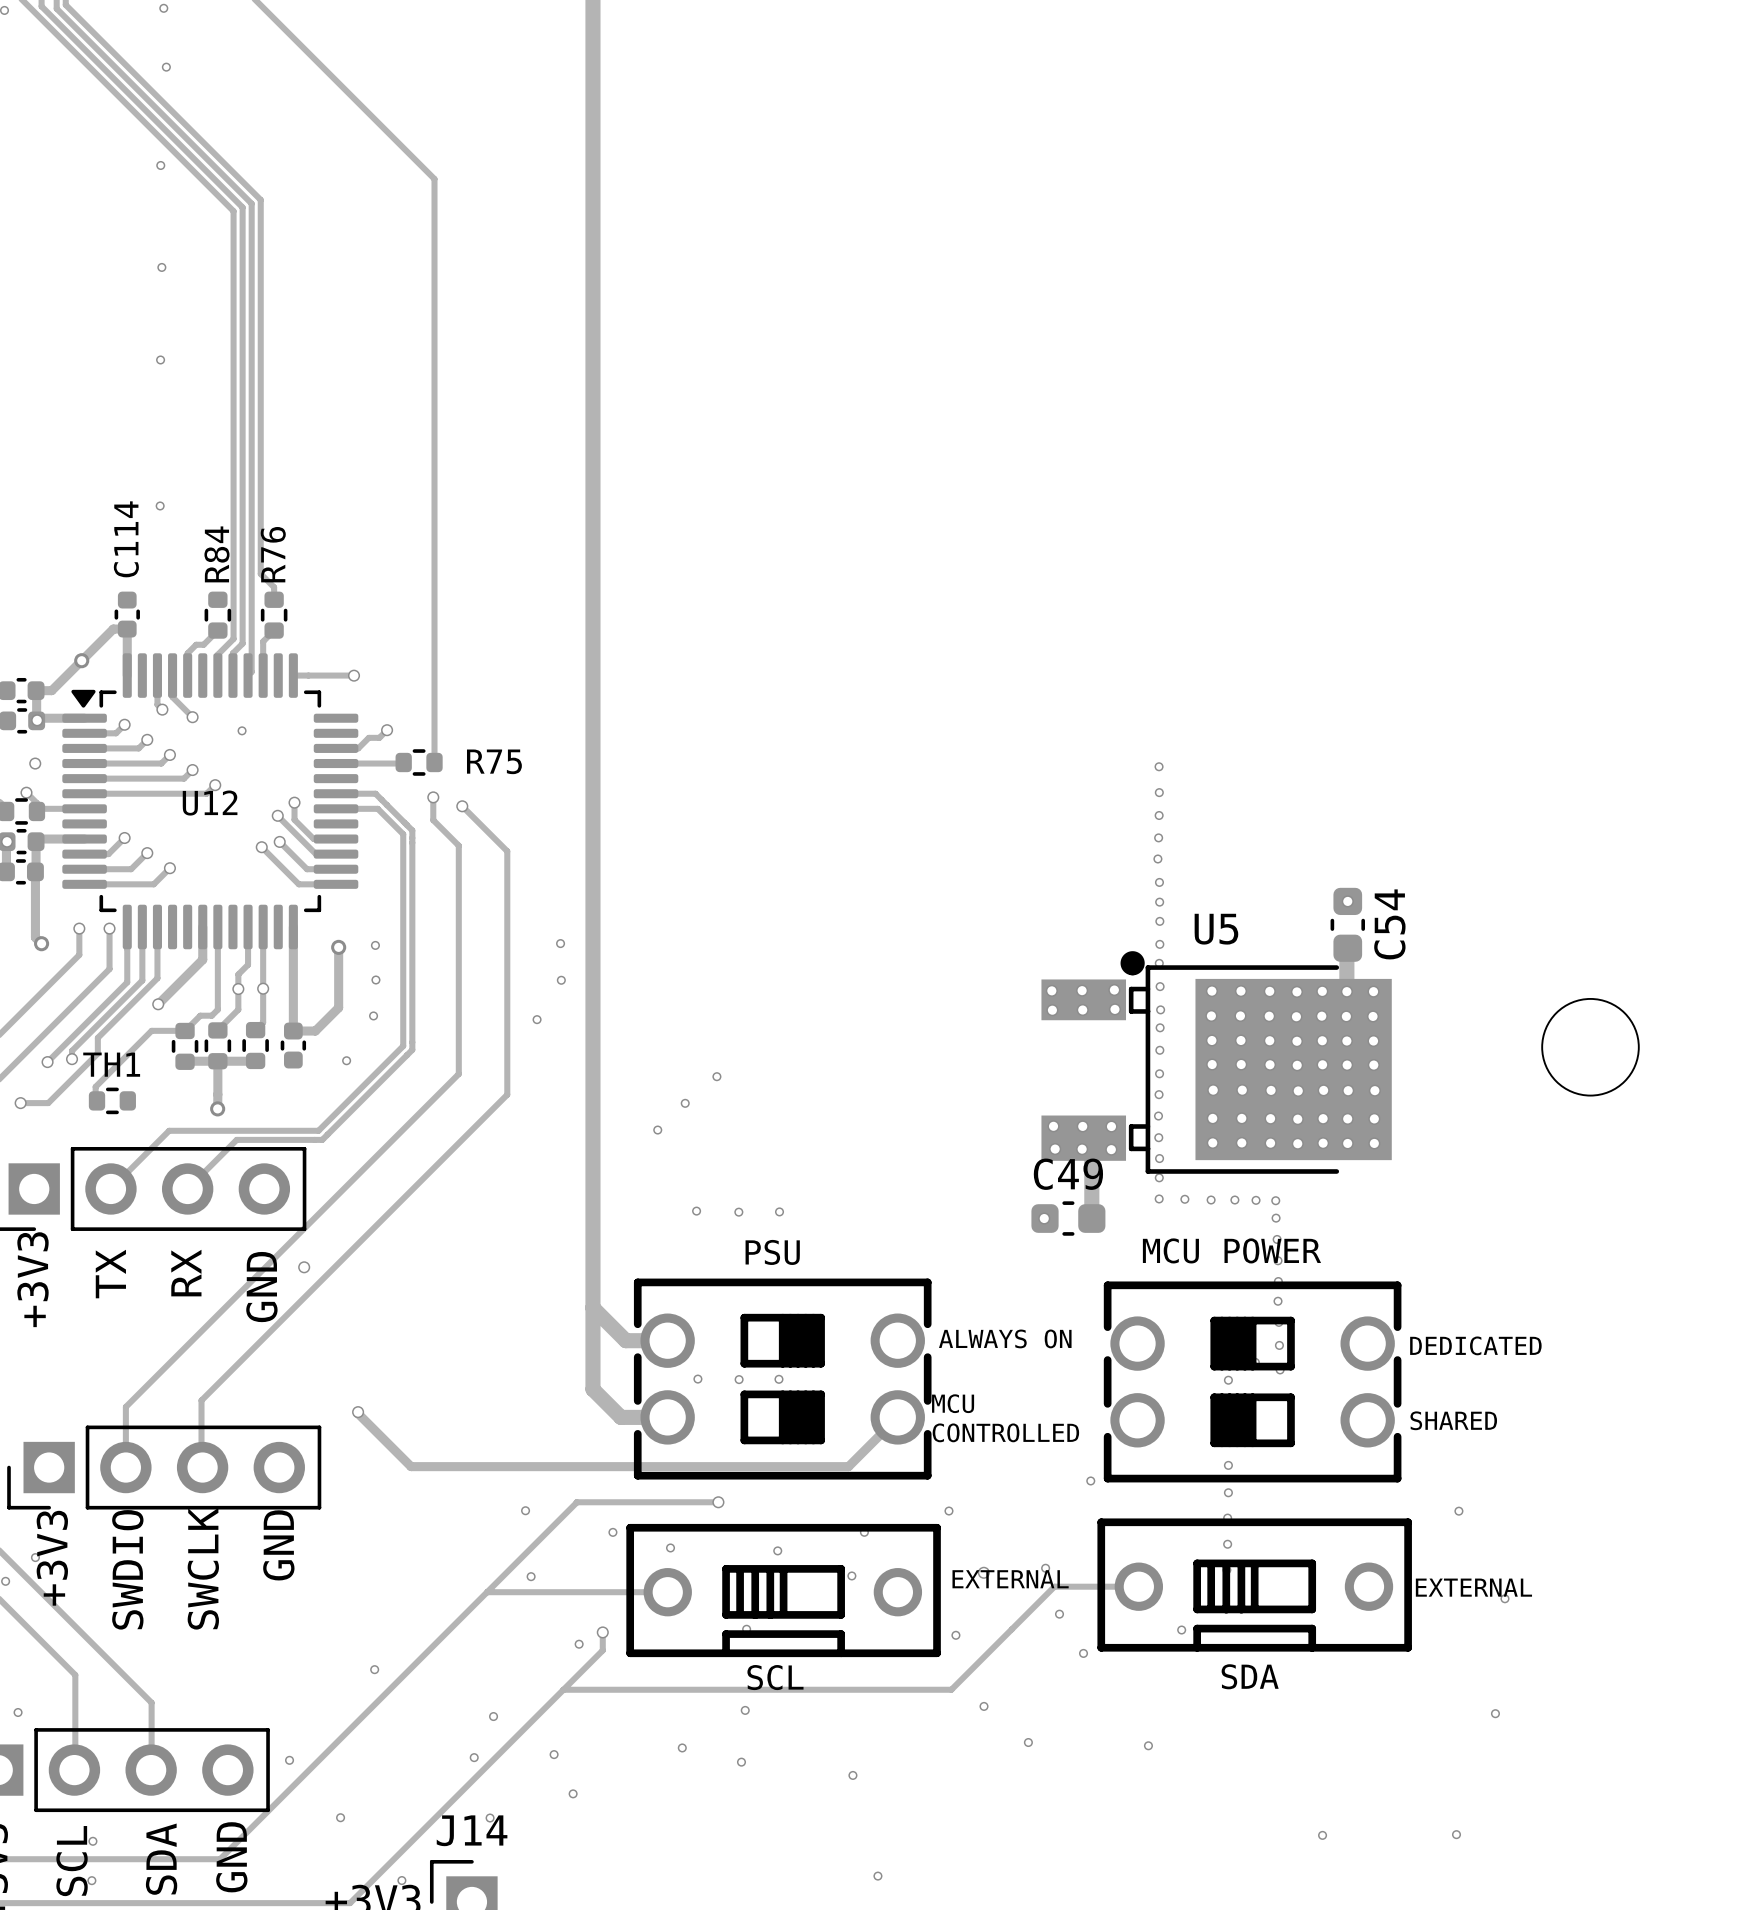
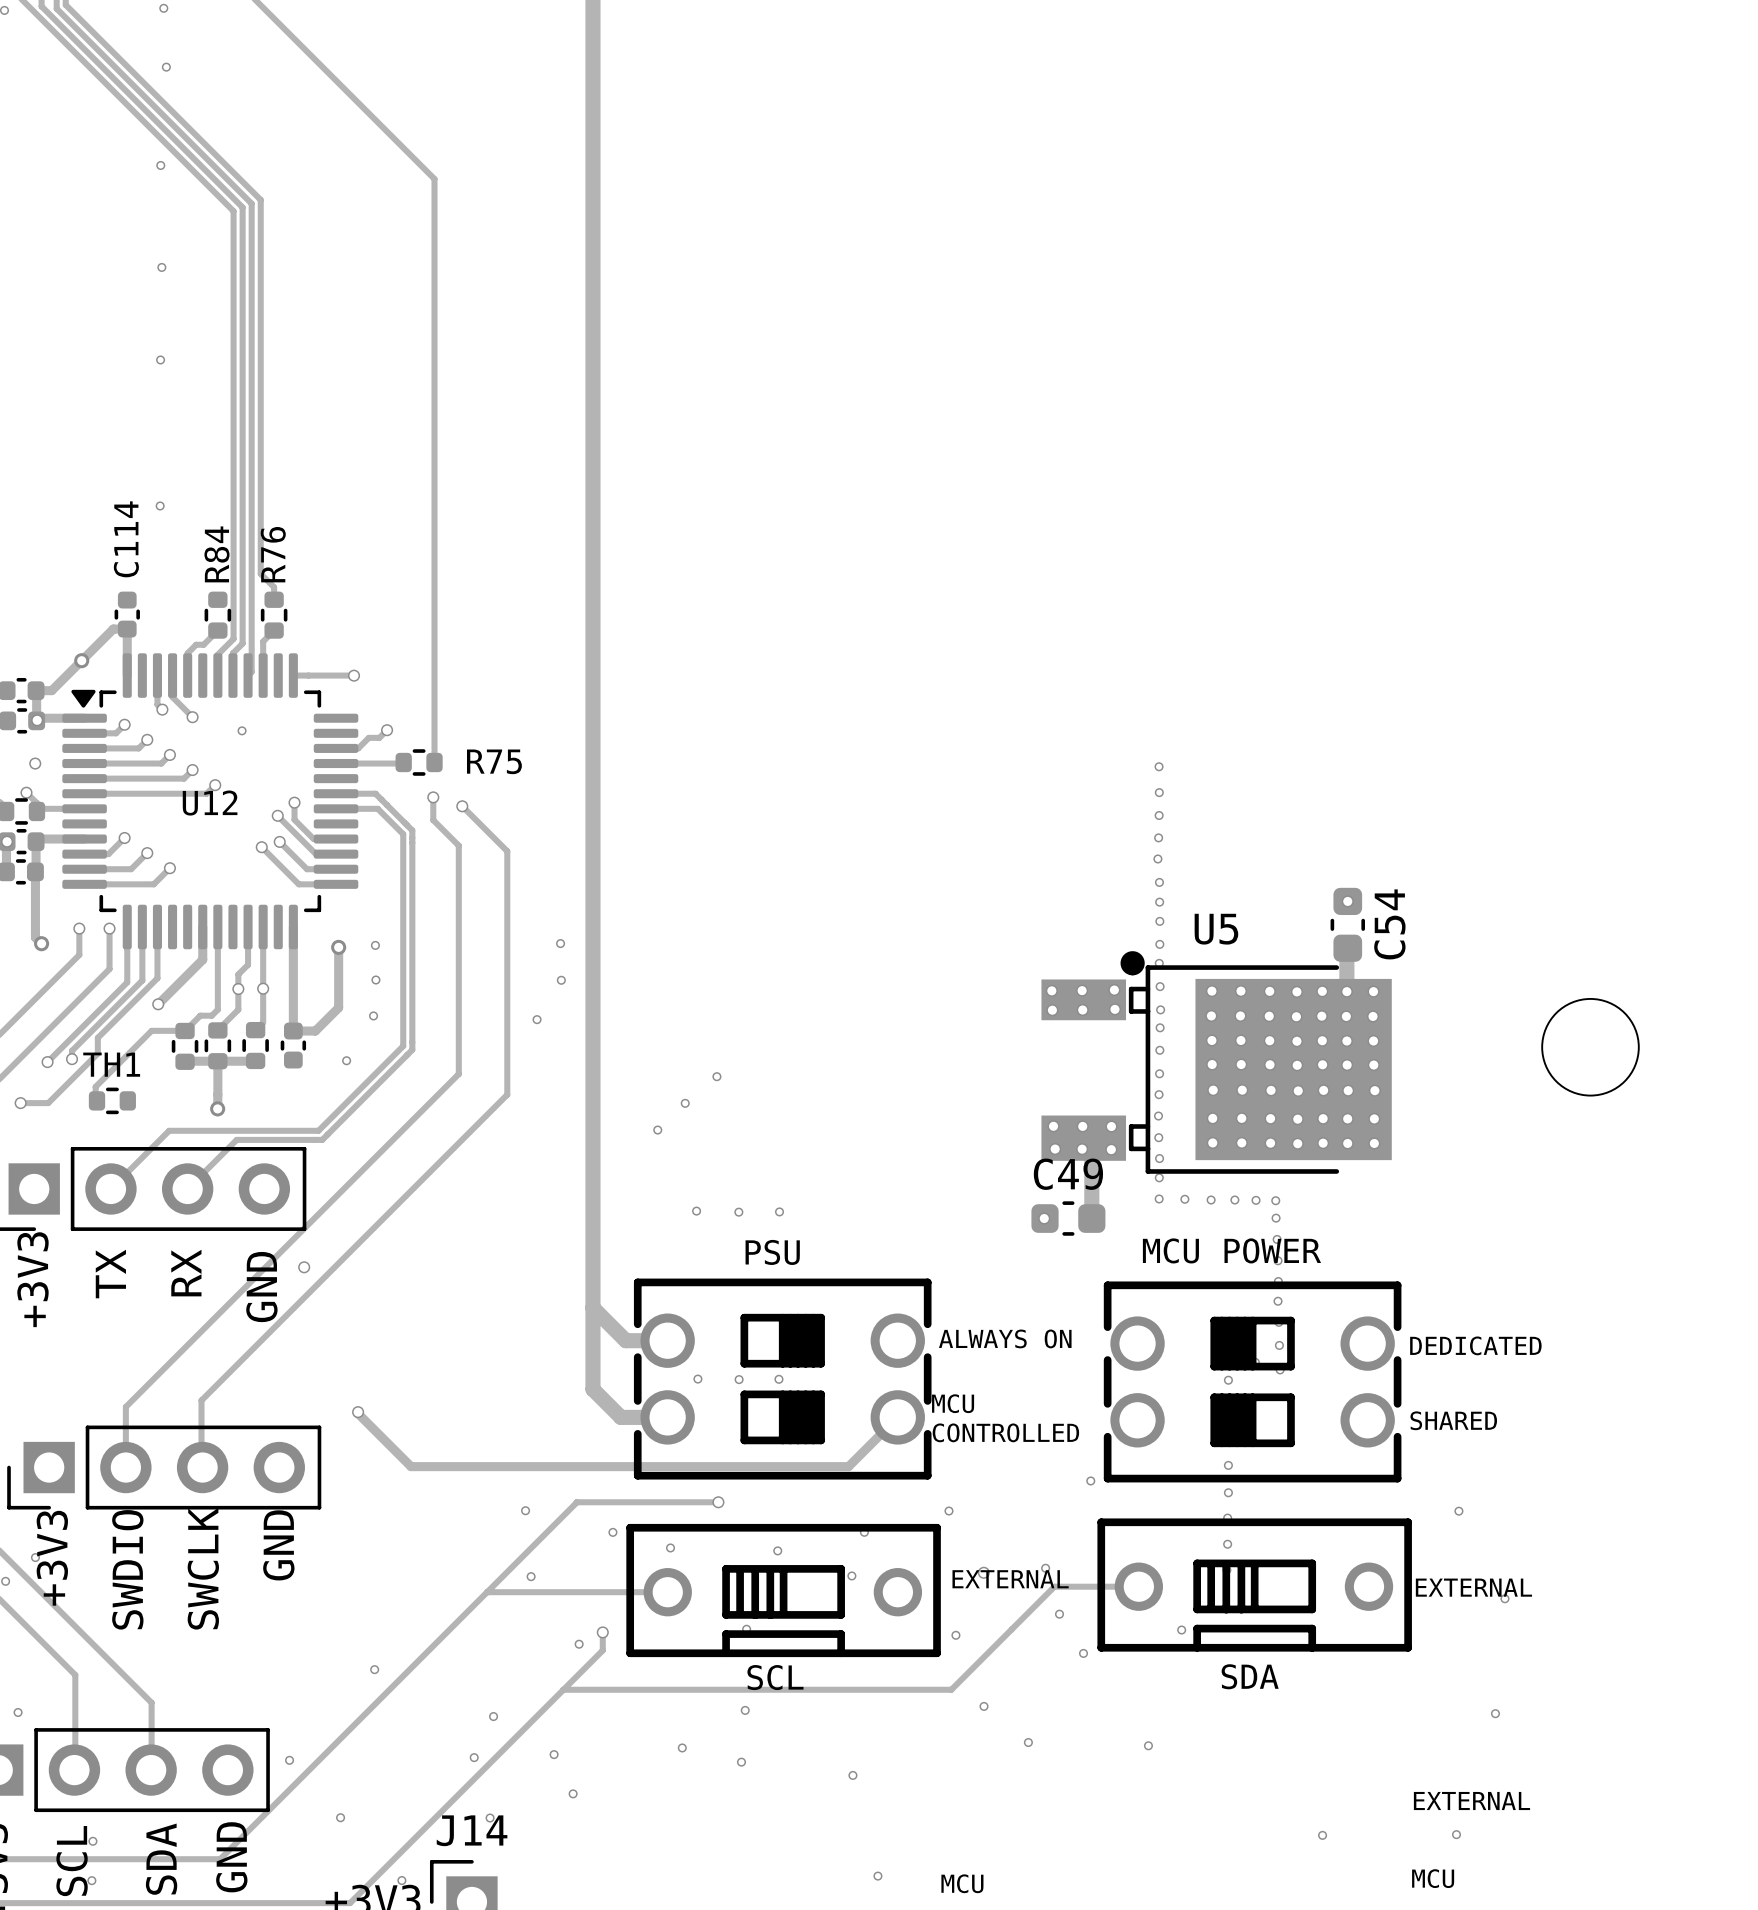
text: none -> EXTERNAL (1471, 1801)
text: none -> MCU (1433, 1878)
text: none -> MCU (962, 1883)

